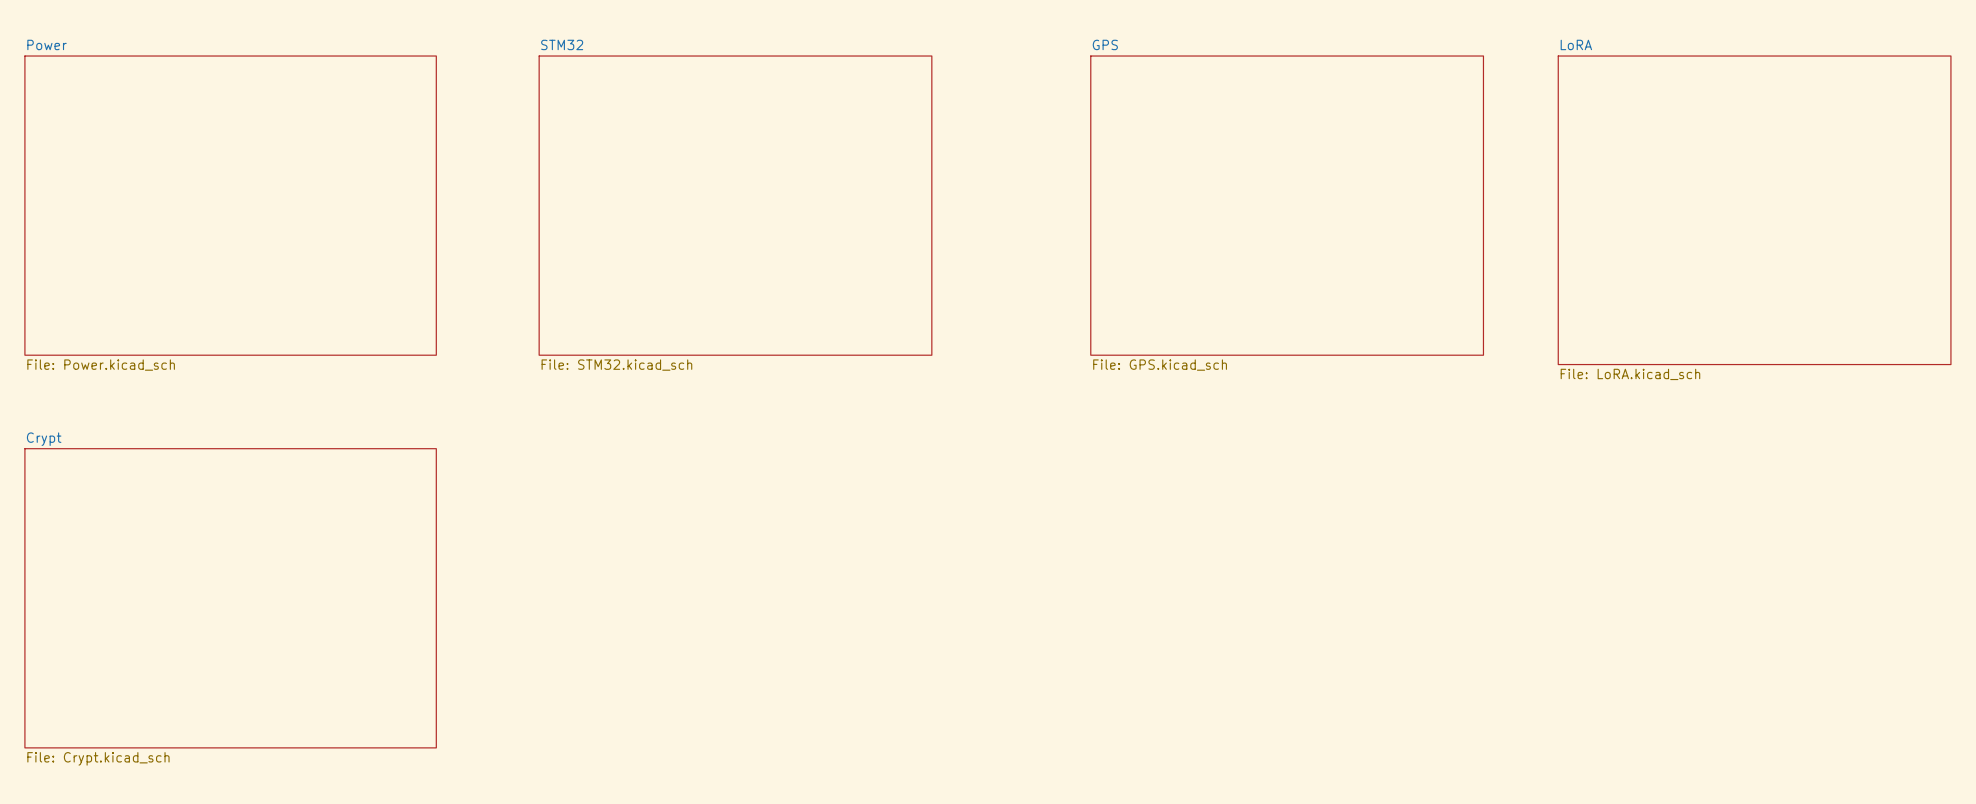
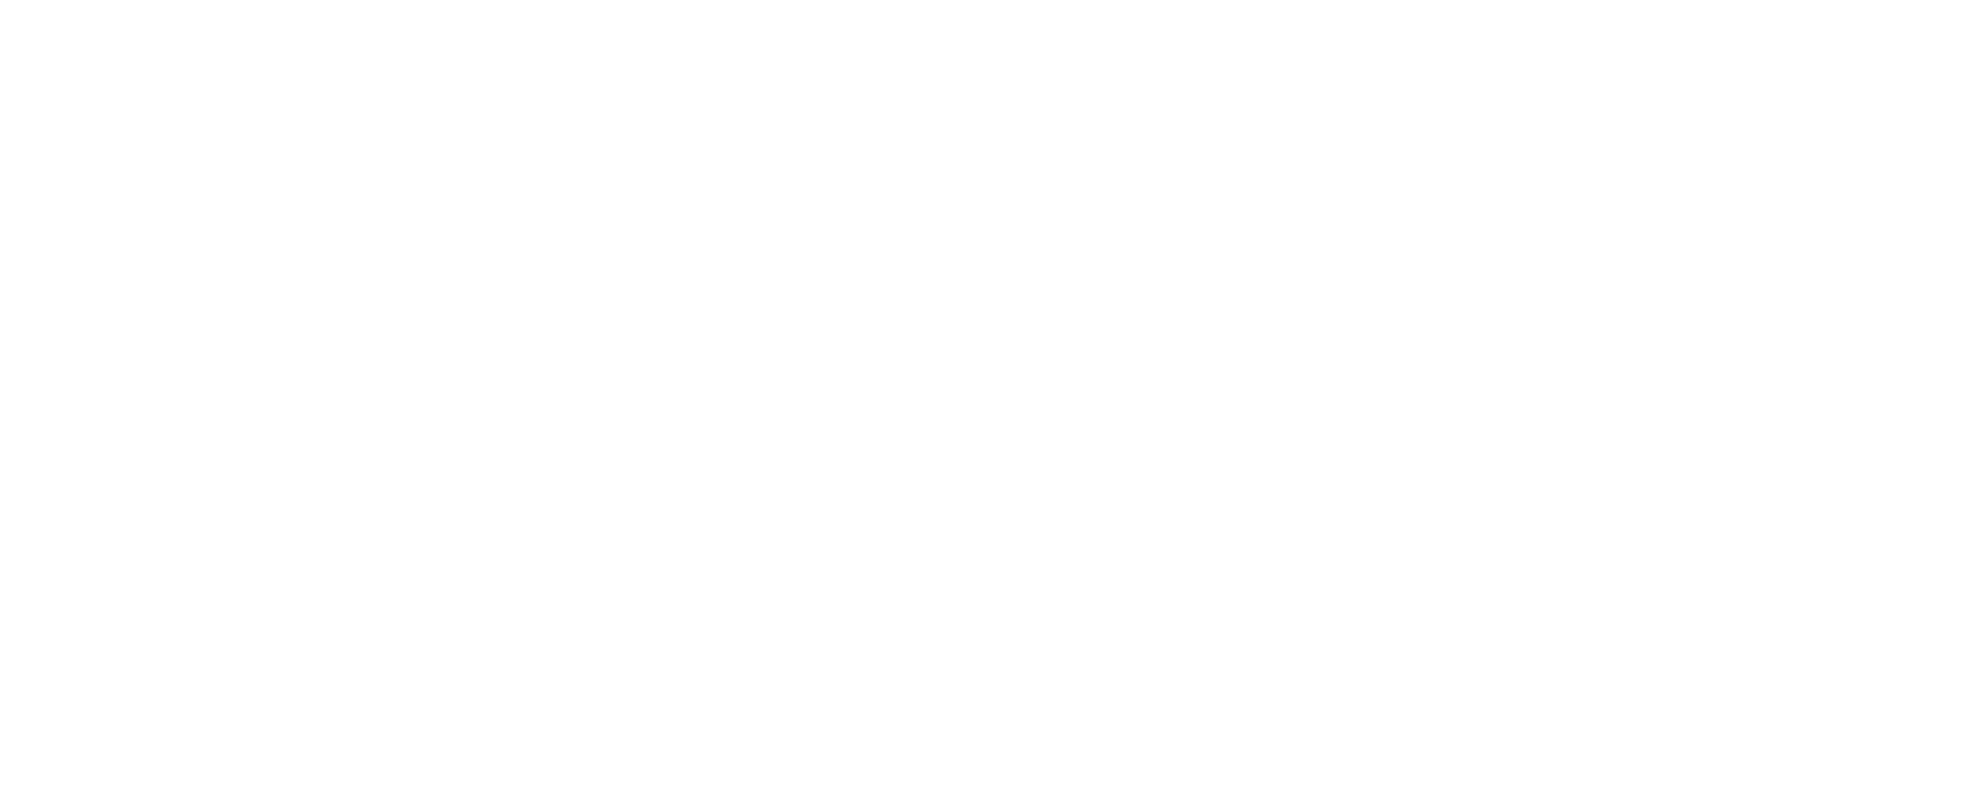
sheet Power: File: Power.kicad_sch (230, 205) -> none
sheet STM32: File: STM32.kicad_sch (735, 205) -> none
sheet GPS: File: GPS.kicad_sch (1287, 205) -> none
sheet LoRA: File: LoRA.kicad_sch (1754, 210) -> none
sheet Crypt: File: Crypt.kicad_sch (230, 598) -> none

